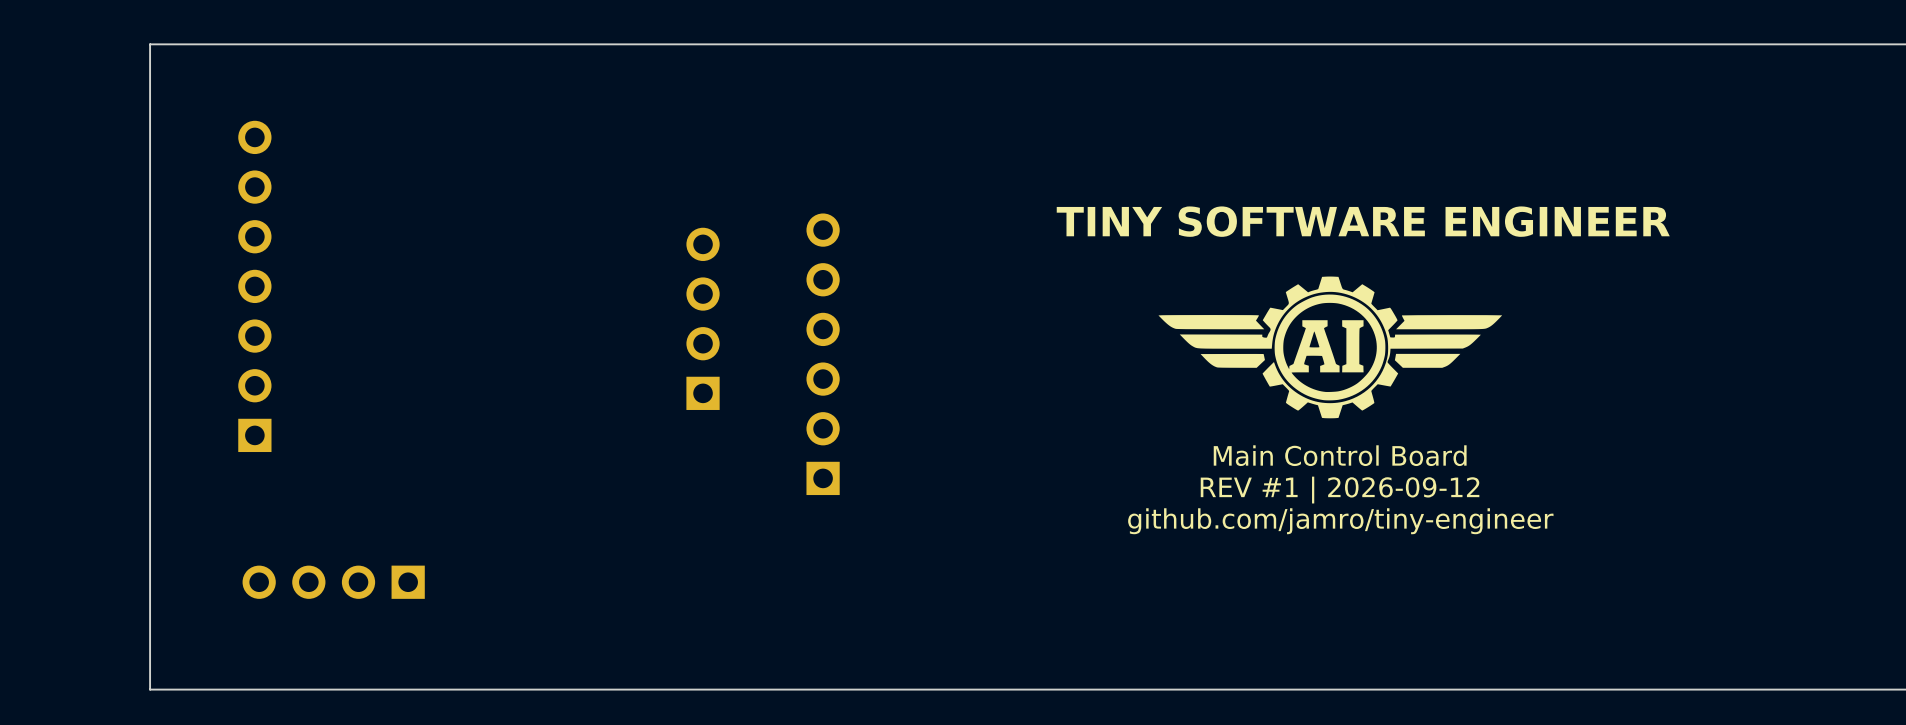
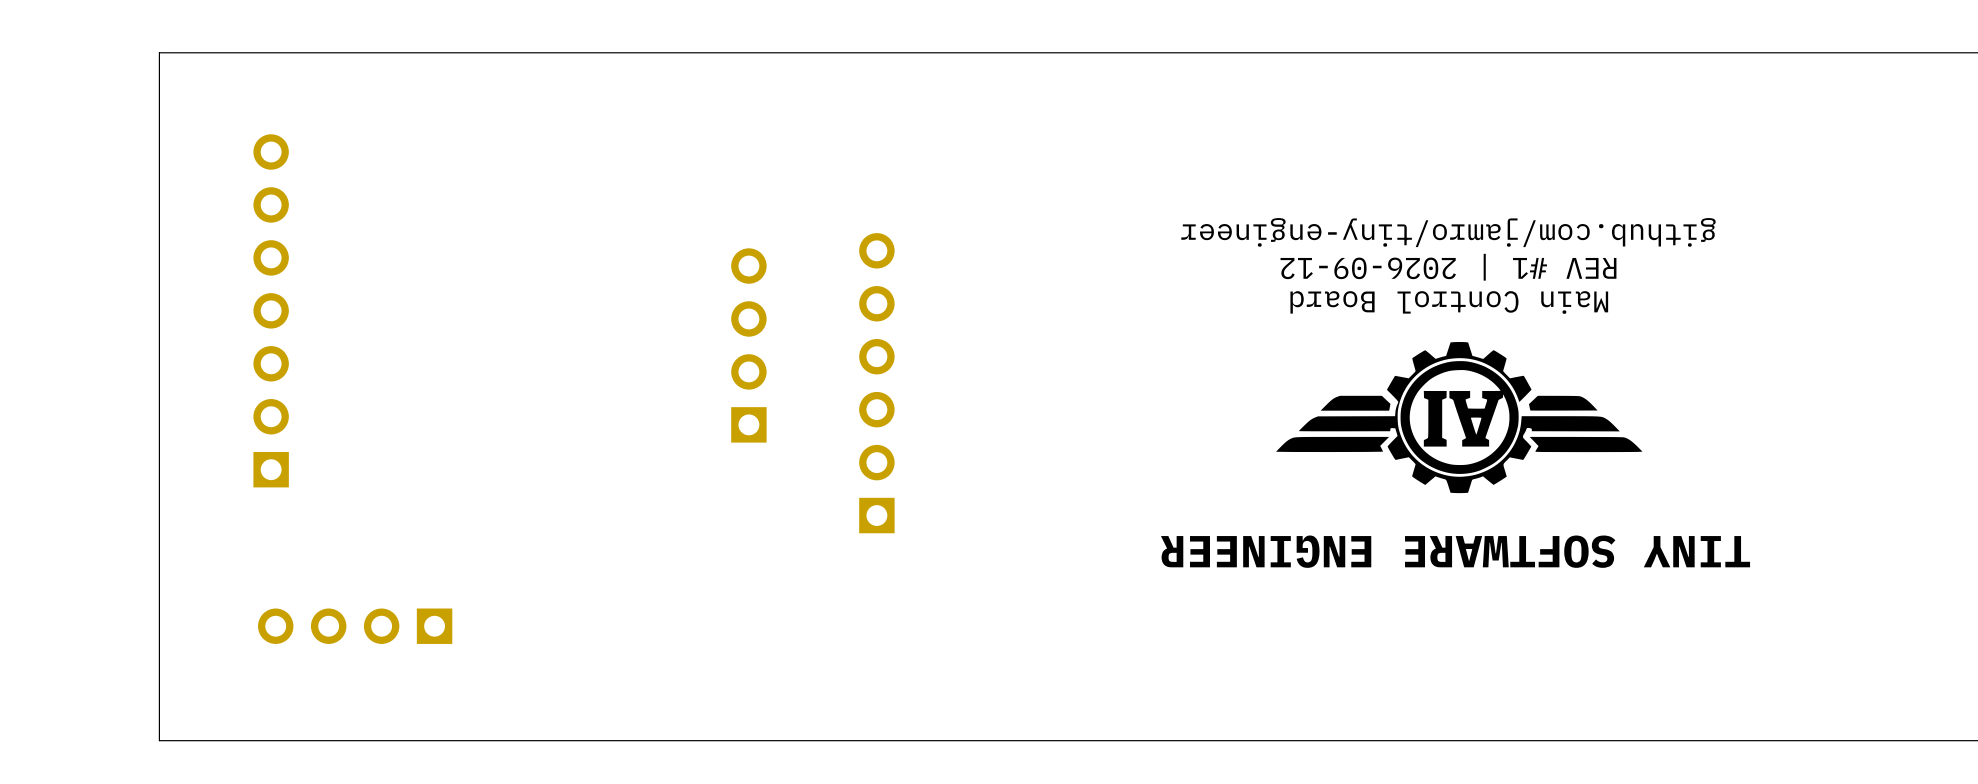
text: TINY SOFTWARE ENGINEER (1363, 221) -> none
drawing: [1158, 276, 1503, 419] -> none
drawing: none -> [1276, 342, 1643, 494]
text rotation: 0° (1340, 455) -> 180° (1449, 302)
text rotation: 0° (1340, 490) -> 180° (1448, 267)
text: none -> TINY SOFTWARE ENGINEER (1455, 551)
text rotation: 0° (1340, 521) -> 180° (1448, 232)

